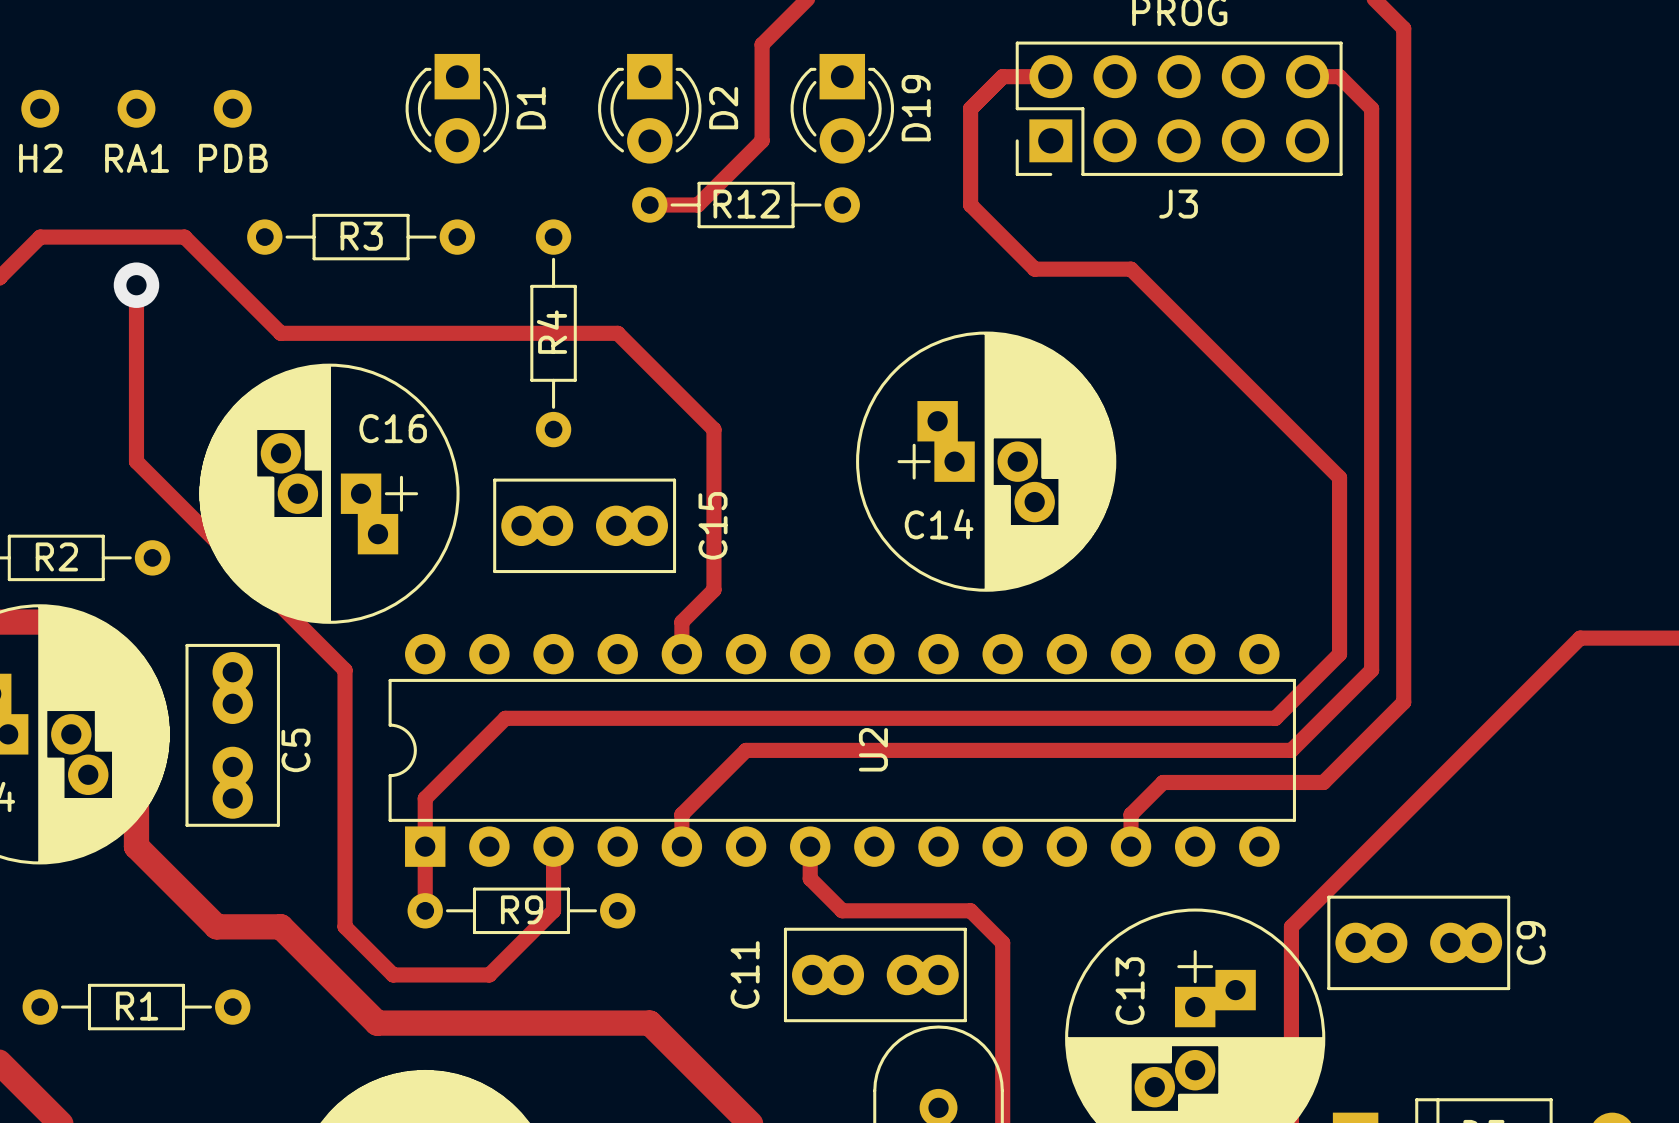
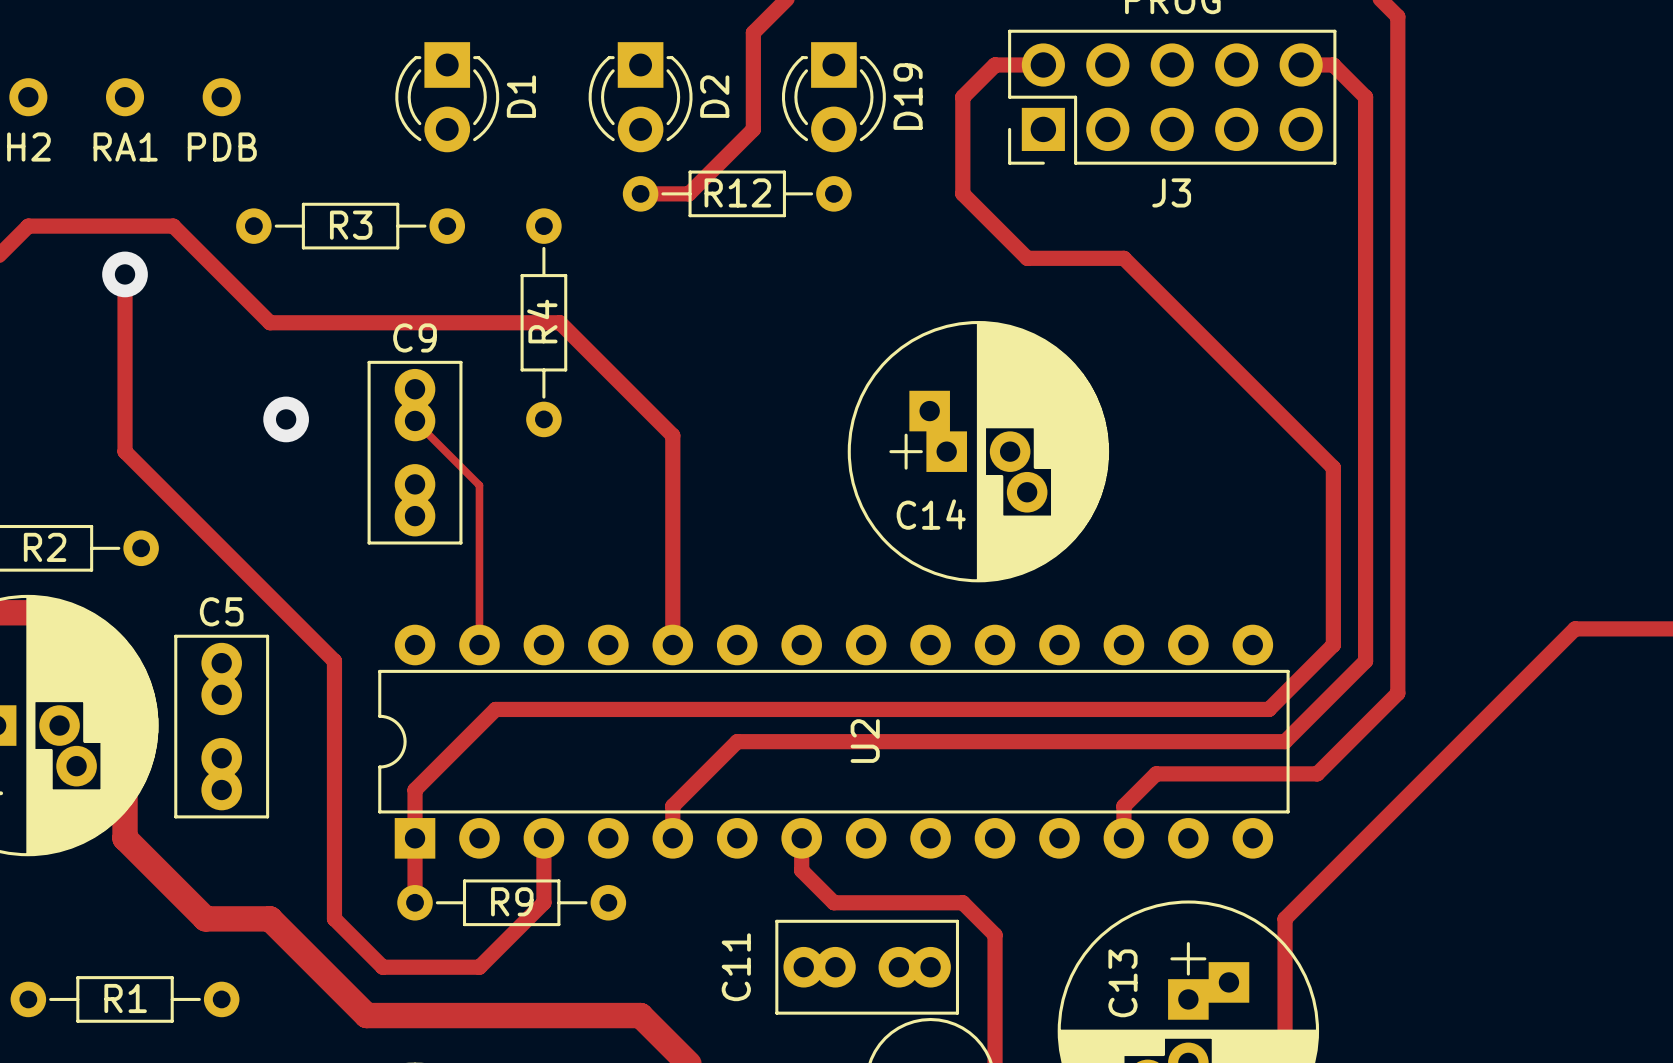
track: (569, 333) (617, 333) (713, 429) (713, 589) (681, 622) -> (560, 322) (672, 435) (672, 612)
track: none -> (415, 389) (415, 420) (479, 485) (479, 644)
via: none -> (286, 419)
C16: (329, 493) -> none
C15: (584, 525) -> none
C5 name rotation: 0° (295, 750) -> 90° clockwise (221, 611)
C5 name position: C5 (295, 750) -> C5 (221, 611)
C9 rotation: 0° (1418, 942) -> 90° clockwise (415, 452)
C9 position: (1418, 942) -> (415, 452)
C9 name position: C9 (1531, 942) -> C9 (415, 337)

